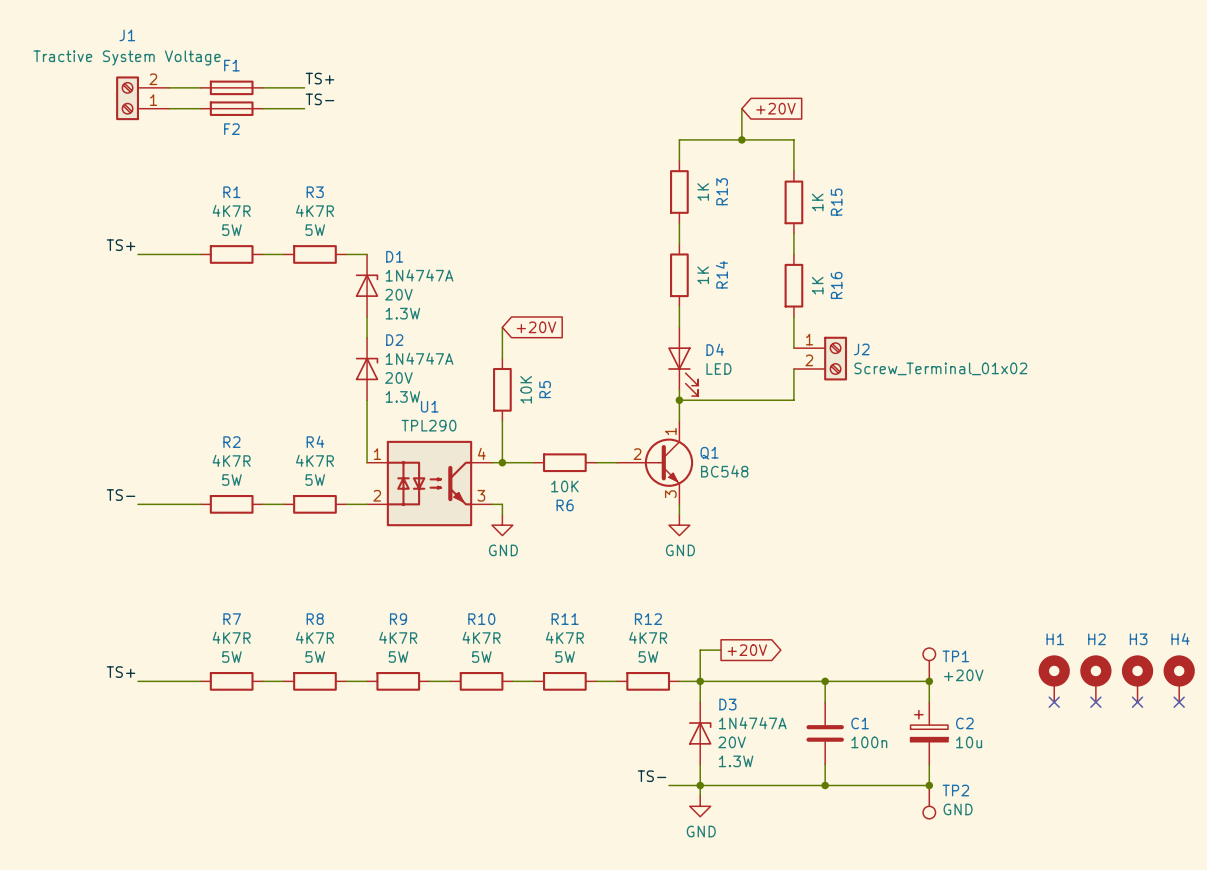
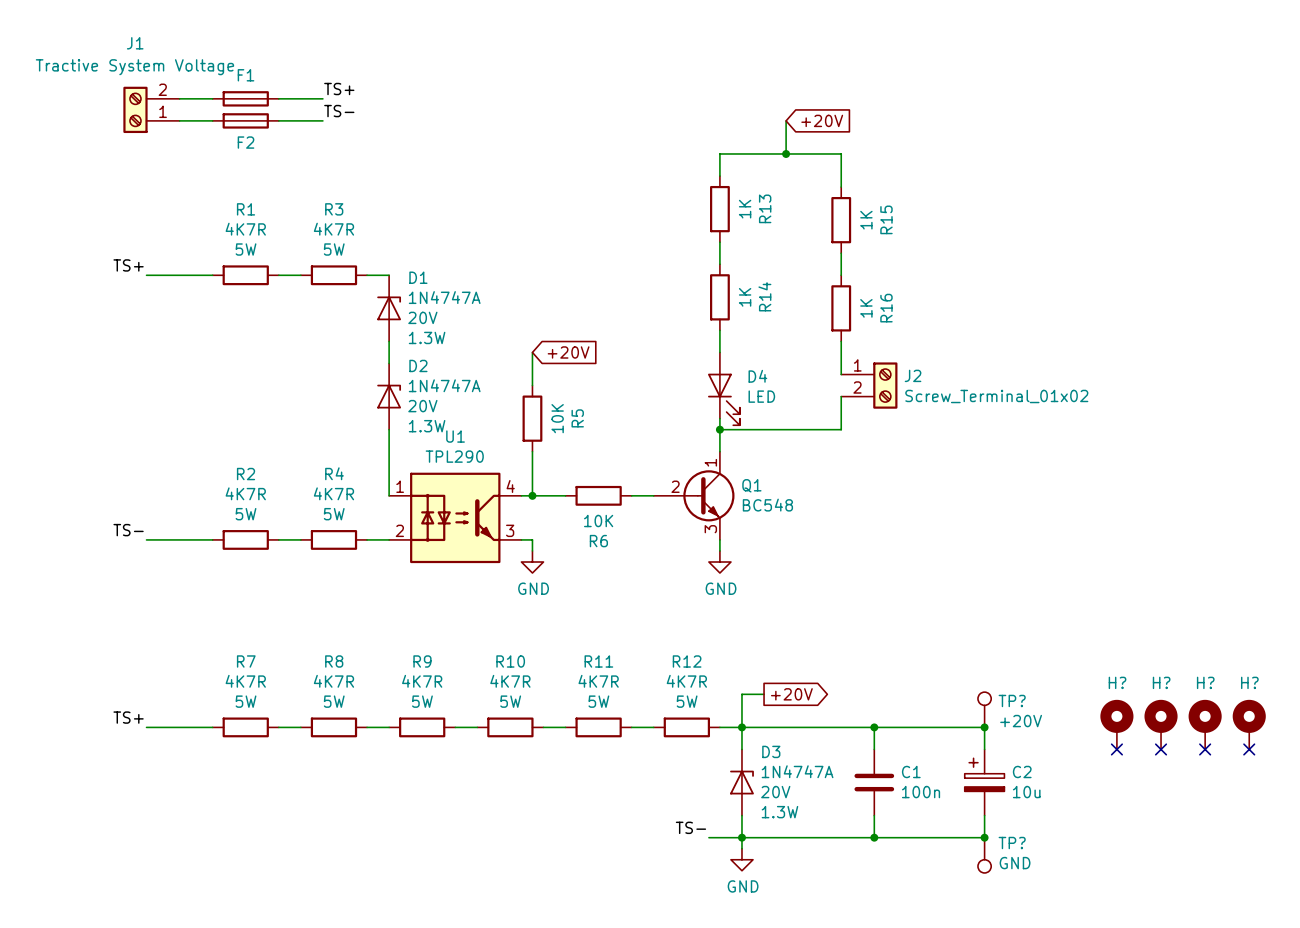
H1 name: H1 (1055, 639) -> H? (1117, 682)
H2 name: H2 (1096, 639) -> H? (1161, 682)
H3 name: H3 (1138, 639) -> H? (1205, 682)
H4 name: H4 (1180, 639) -> H? (1249, 682)
TP1 name: TP1 (955, 656) -> TP? (1012, 700)
TP2 name: TP2 (955, 790) -> TP? (1012, 843)

